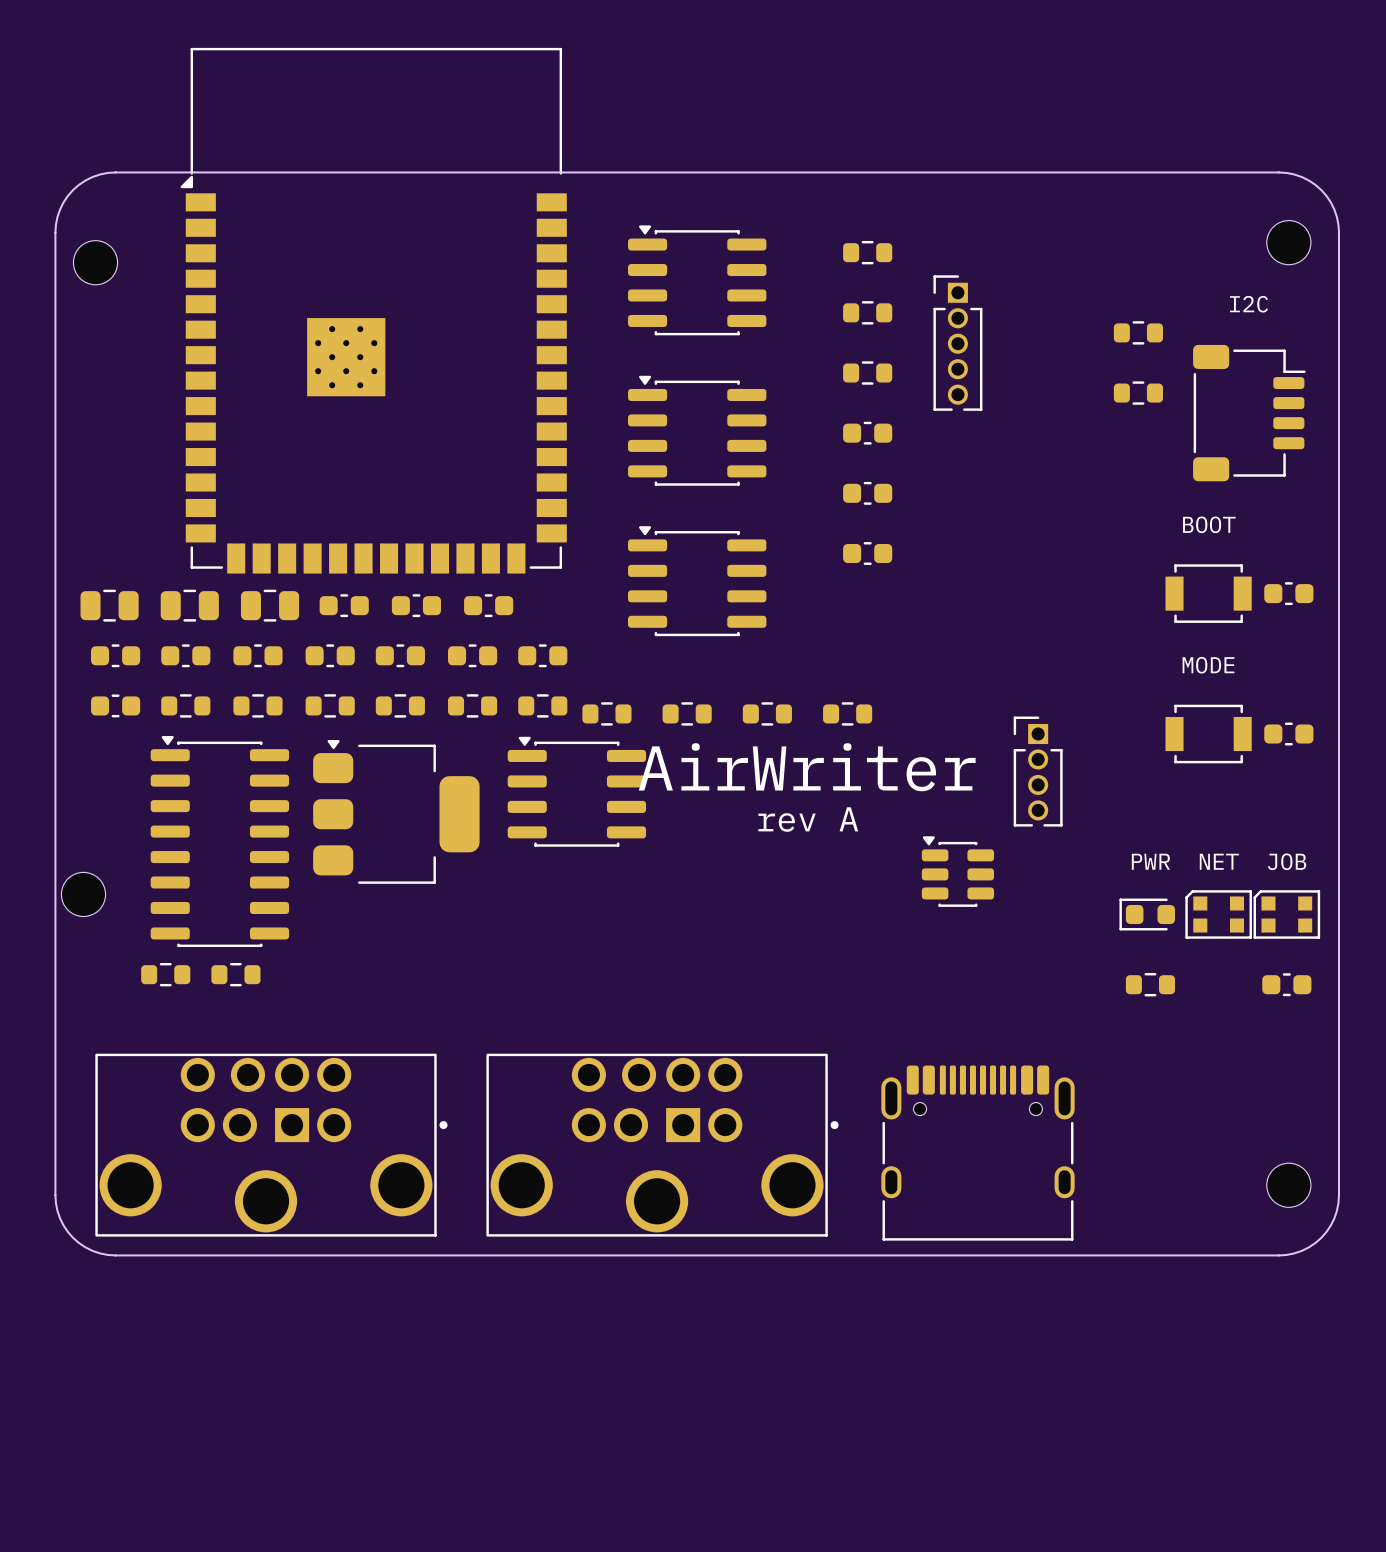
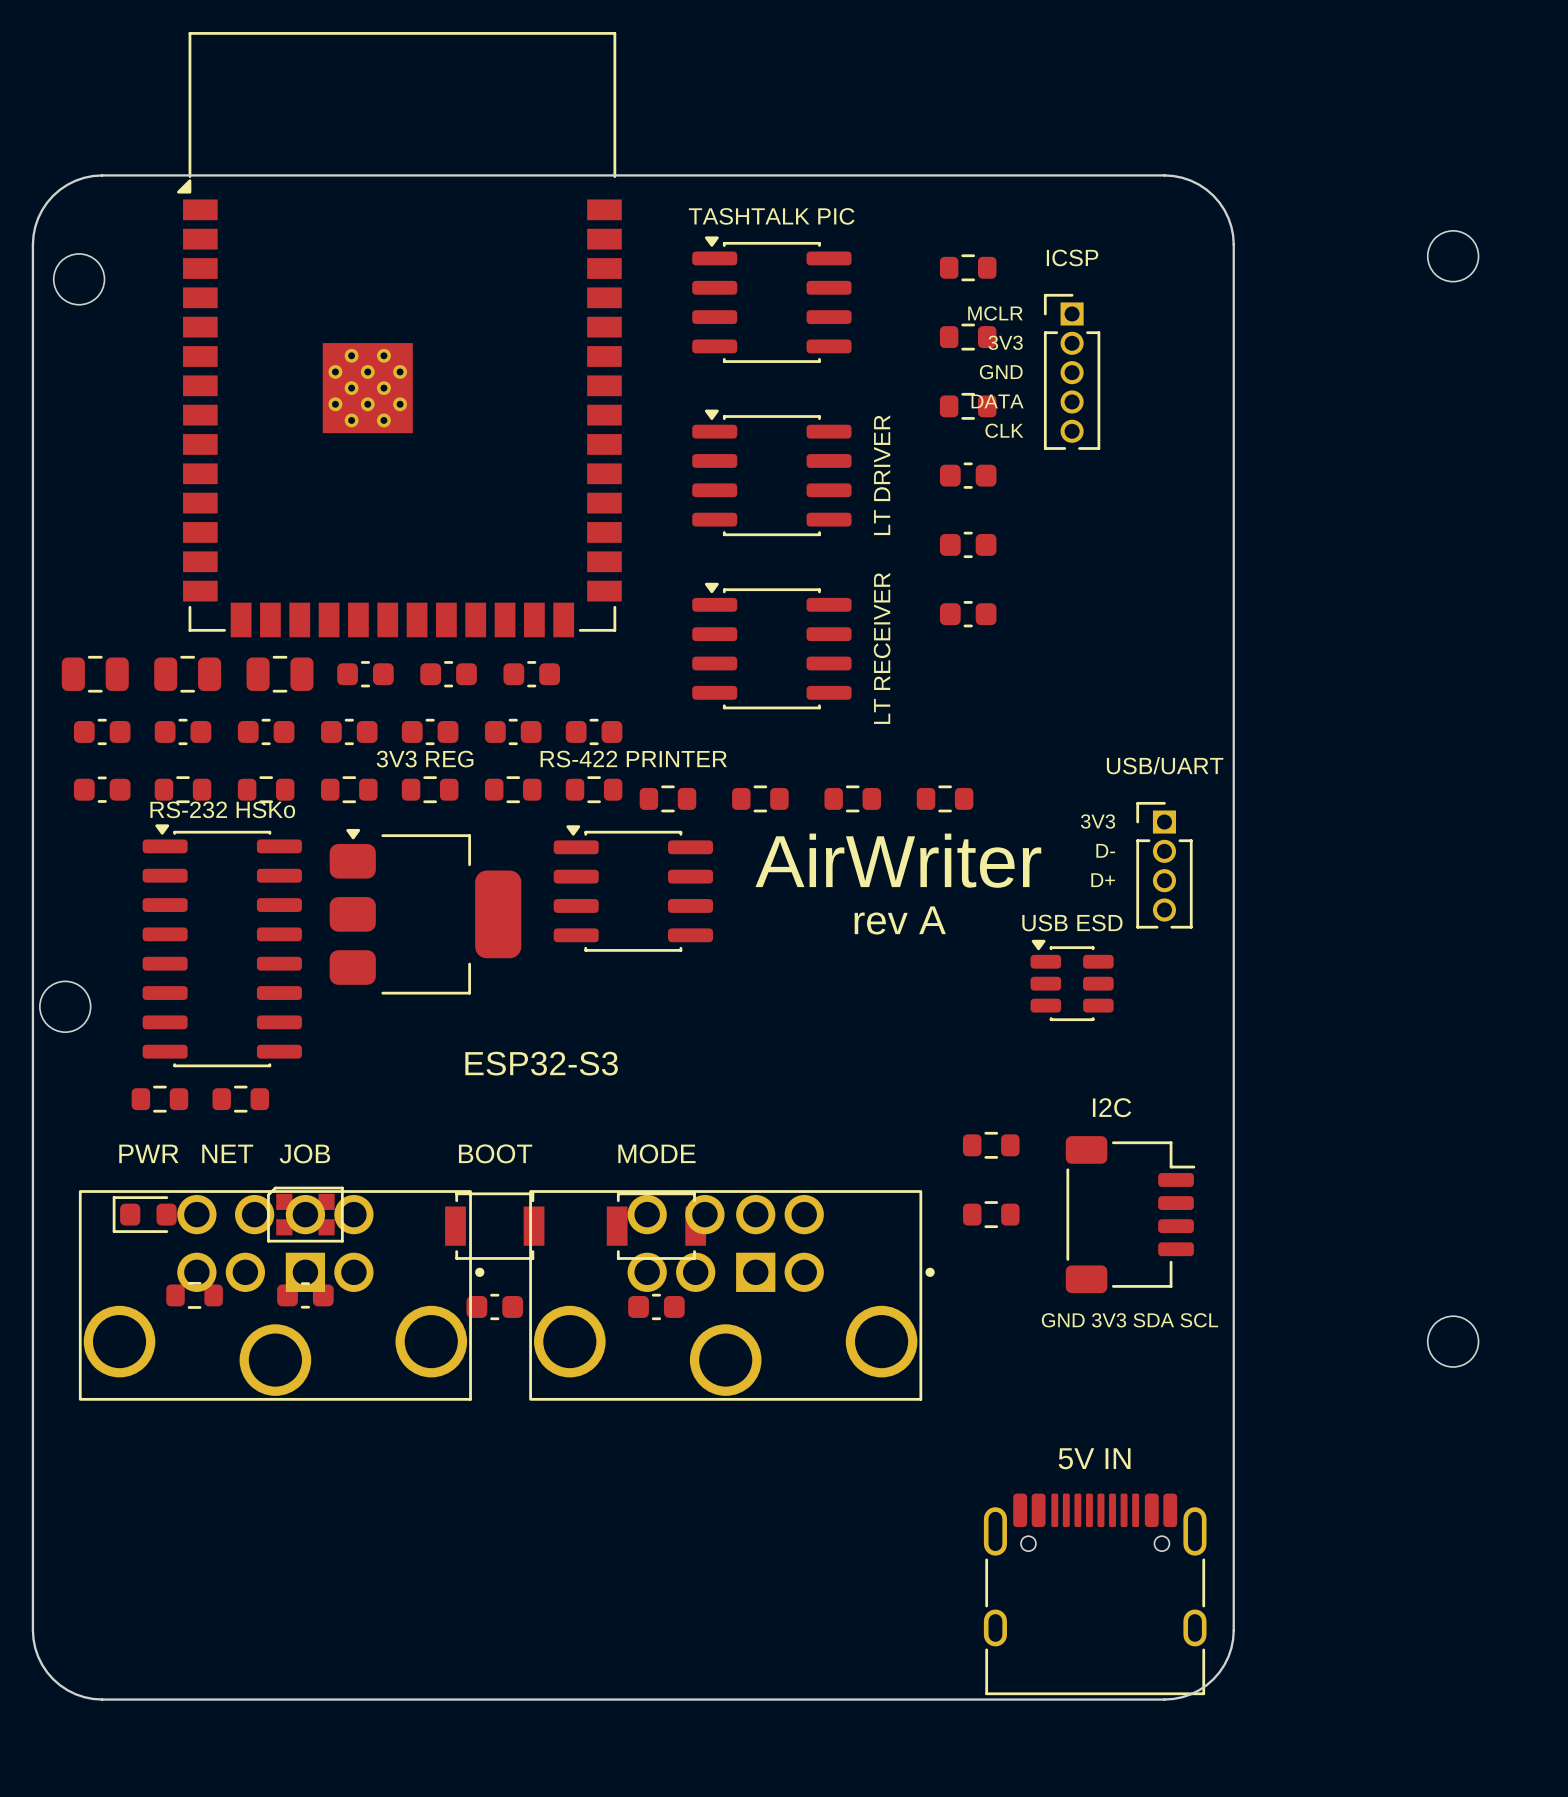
board edge: (1038, 172) (1286, 172) (1301, 177) (1315, 184) (1330, 202) (1336, 217) (1338, 232) (1338, 1195) (1334, 1218) (1321, 1237) (1301, 1250) (1278, 1255) (115, 1255) (92, 1250) (73, 1237) (60, 1218) (55, 1195) -> (1164, 175) (1190, 180) (1213, 195) (1228, 218) (1233, 244) (1233, 1630) (1228, 1656) (1213, 1679) (1190, 1694) (1164, 1699) (102, 1699) (84, 1697) (60, 1685) (47, 1672) (38, 1656) (33, 1639) (32, 1353)
text: none -> TASHTALK PIC (771, 216)
text: none -> ICSP (1072, 257)
text: none -> MCLR (995, 313)
text: I2C (1248, 304) -> none
text: none -> 3V3 (1005, 342)
part: (1138, 332) -> none
text: none -> GND (1001, 372)
text: none -> DATA (997, 401)
part: (1138, 393) -> none
text: none -> CLK (1004, 430)
part: (1249, 413) -> none
text: none -> LT DRIVER (882, 475)
text: BOOT (1209, 524) -> none
text: none -> LT RECEIVER (882, 648)
part: (1208, 593) -> none
part: (1288, 593) -> none
text: MODE (1208, 665) -> none
text: none -> 3V3 REG (425, 759)
text: none -> RS-422 PRINTER (633, 759)
text: none -> USB/UART (1165, 765)
text: none -> RS-232 HSKo (222, 809)
text: none -> 3V3 (1098, 821)
part: (1208, 734) -> none
part: (1288, 734) -> none
text: none -> D- (1105, 850)
text: none -> D+ (1103, 880)
text: none -> USB ESD (1072, 923)
text: PWR (1150, 861) -> none
text: NET (1219, 861) -> none
text: JOB (1287, 861) -> none
part: (1147, 914) -> none
part: (1218, 914) -> none
part: (1286, 914) -> none
text: none -> ESP32-S3 (541, 1063)
text: none -> I2C (1112, 1107)
part: (1150, 984) -> none
part: (1286, 984) -> none
part: none -> (991, 1145)
text: none -> PWR (148, 1153)
text: none -> NET (227, 1153)
text: none -> JOB (304, 1153)
text: none -> BOOT (495, 1153)
text: none -> MODE (656, 1153)
part: none -> (144, 1214)
part: none -> (305, 1214)
part: none -> (991, 1214)
part: none -> (1130, 1214)
part: none -> (494, 1226)
part: none -> (656, 1226)
part: none -> (194, 1295)
part: none -> (305, 1295)
part position: (977, 1153) -> (1095, 1594)
part: none -> (494, 1306)
part: none -> (656, 1306)
text: none -> GND 3V3 SDA SCL (1130, 1320)
text: none -> 5V IN (1094, 1458)

